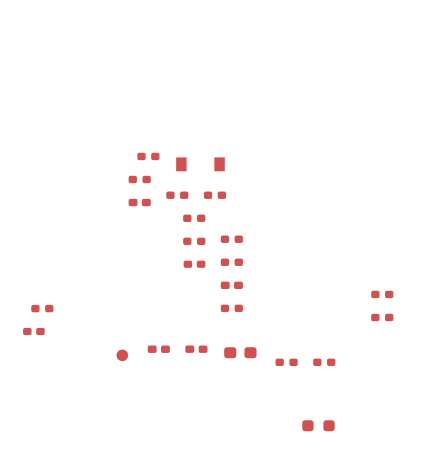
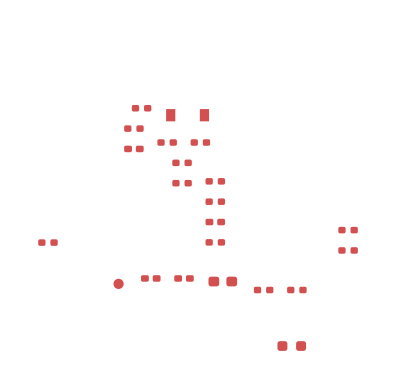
part: (194, 264) -> none
part: (33, 331) -> none

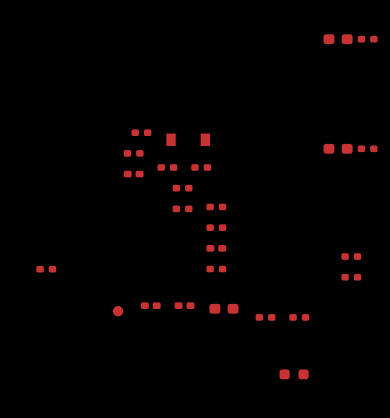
part: none -> (338, 39)
part: none -> (367, 39)
part: none -> (338, 148)
part: none -> (367, 148)

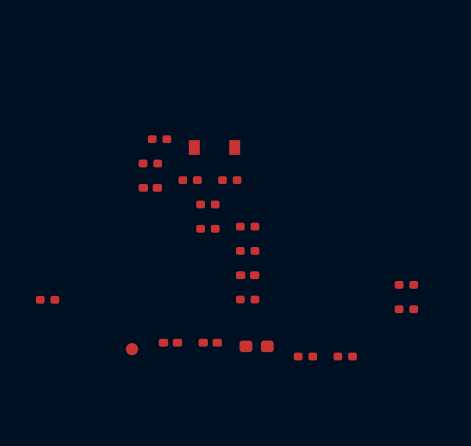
part: (338, 39) -> none
part: (367, 39) -> none
part: (338, 148) -> none
part: (367, 148) -> none
part: (294, 374) -> none

